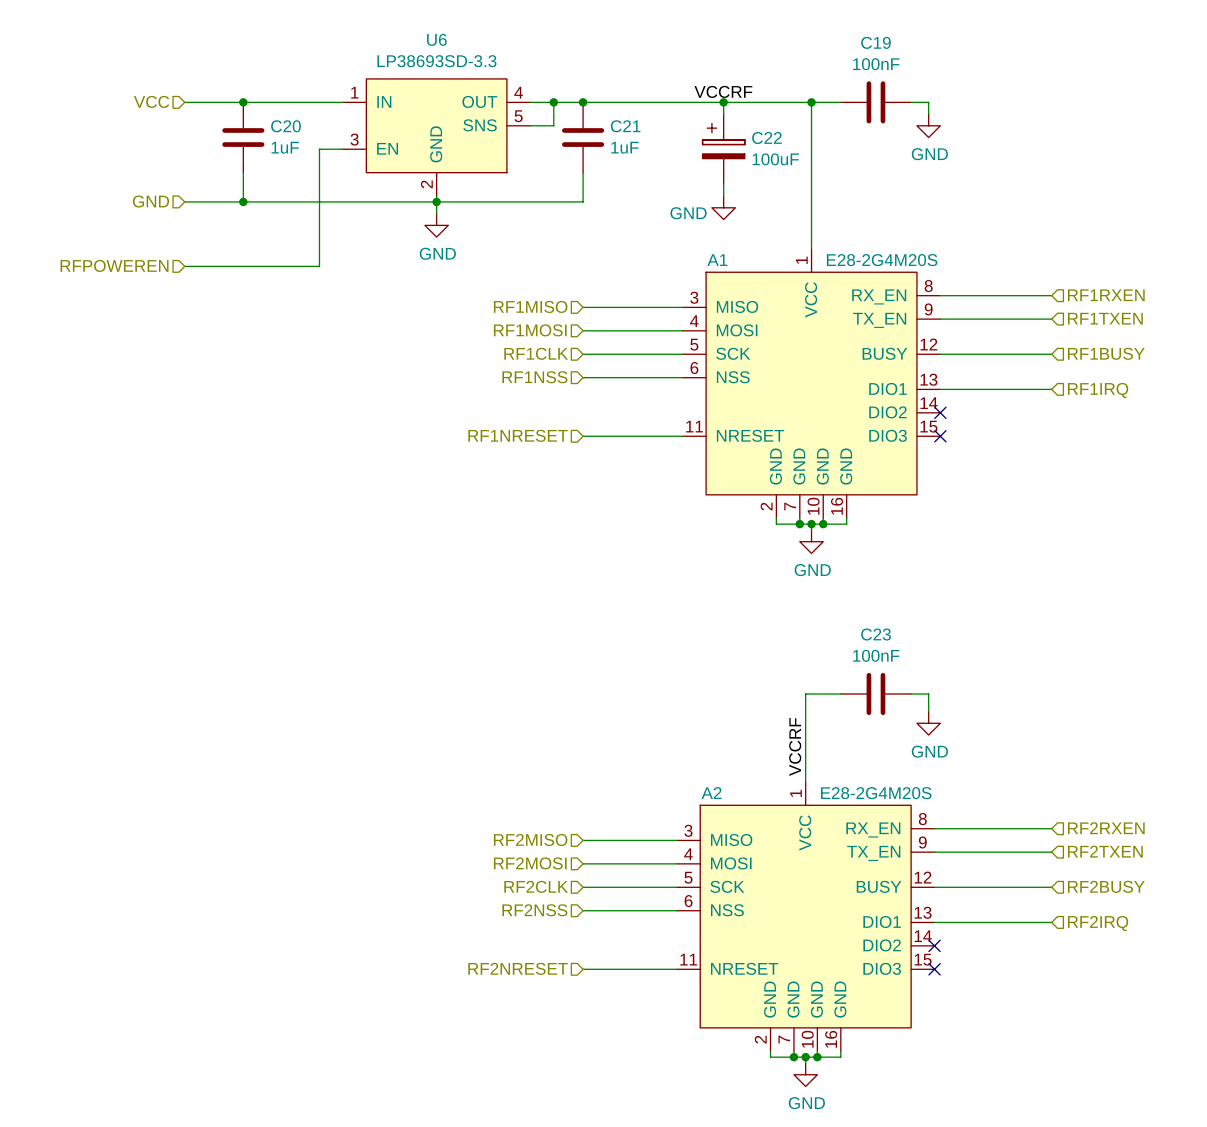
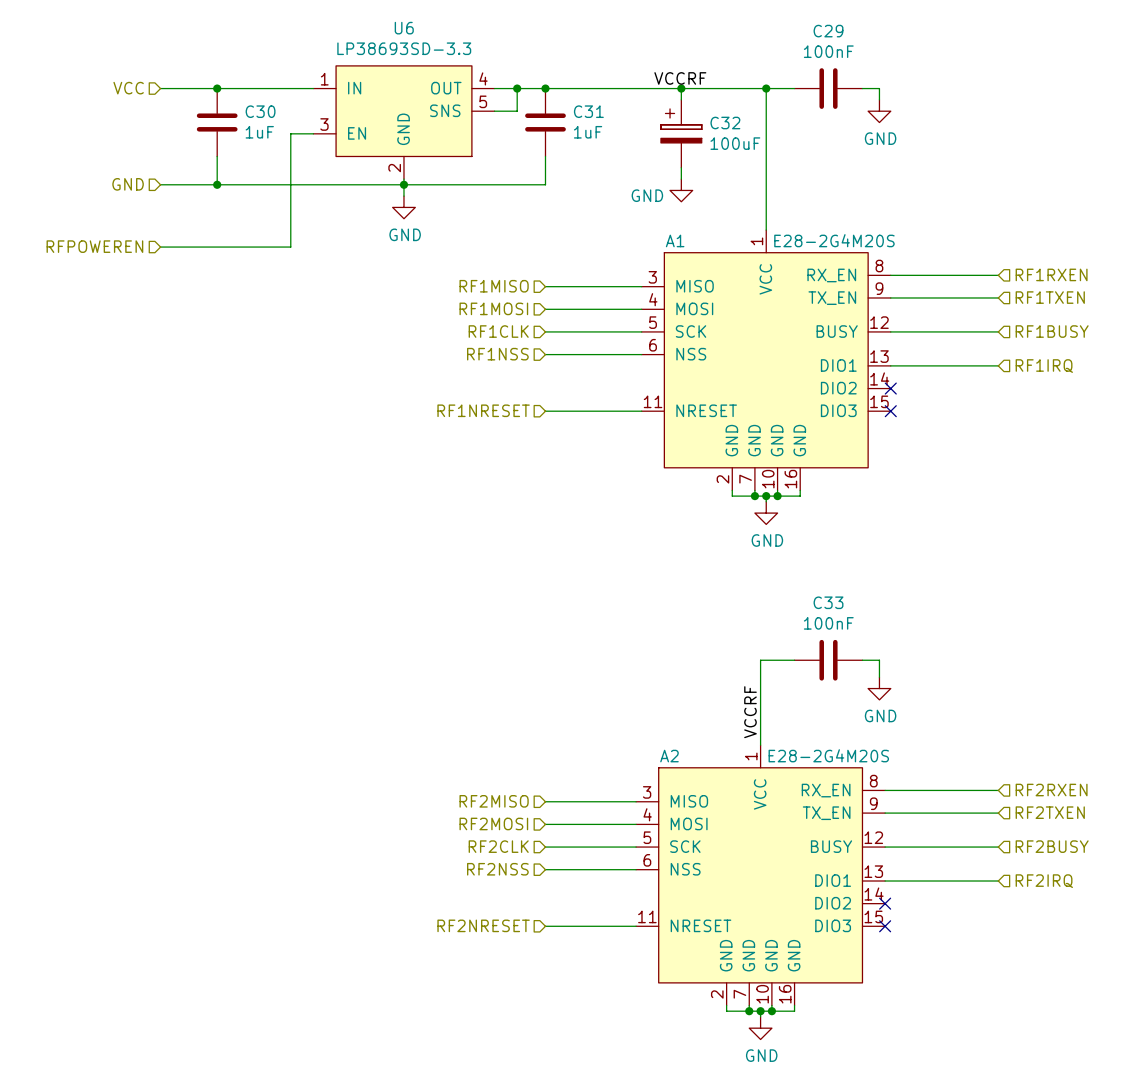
C19 name: C19 (875, 42) -> C29 (828, 31)
C20 name: C20 (285, 126) -> C30 (260, 111)
C21 name: C21 (625, 126) -> C31 (588, 111)
C22 name: C22 (766, 138) -> C32 (725, 123)
C23 name: C23 (876, 634) -> C33 (828, 602)

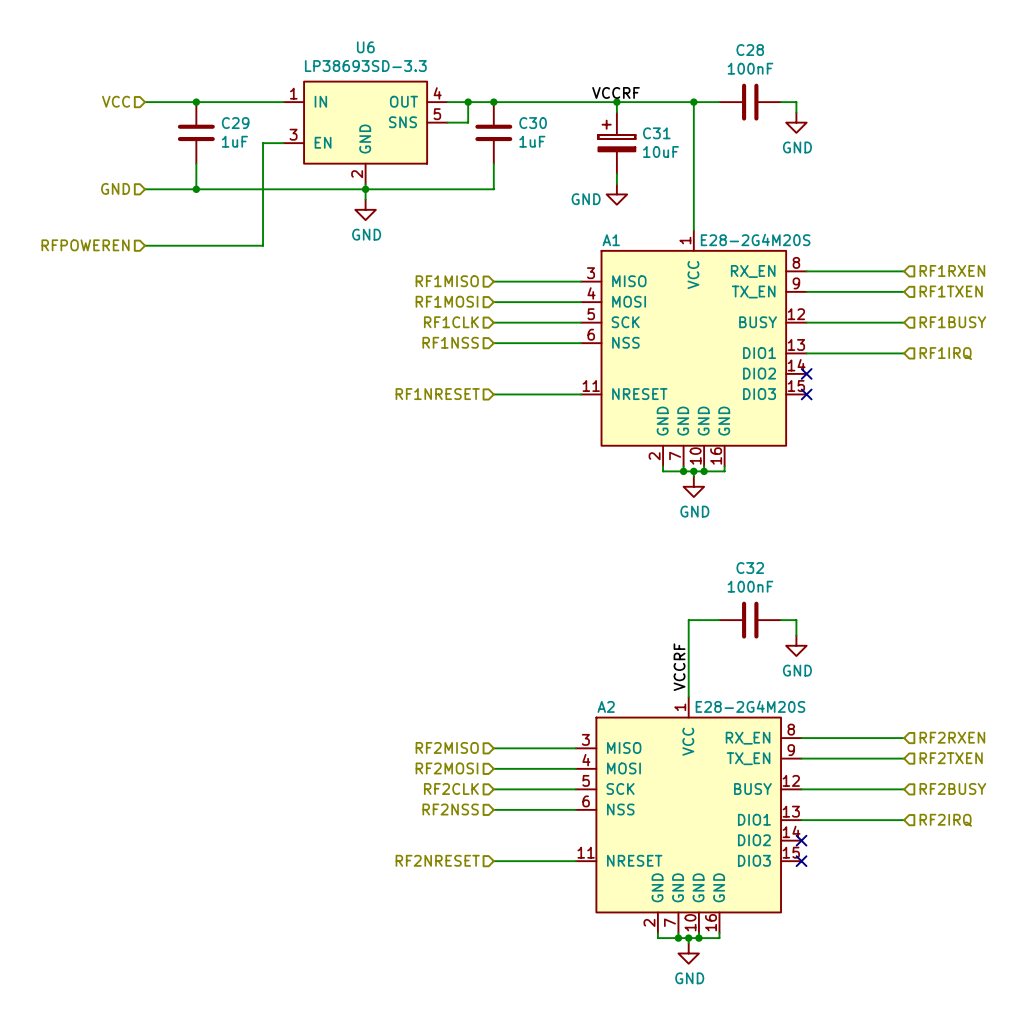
C29 name: C29 (828, 31) -> C28 (750, 50)
C30 name: C30 (260, 111) -> C29 (235, 123)
C31 name: C31 (588, 111) -> C30 (533, 123)
C32 name: C32 (725, 123) -> C31 (656, 133)
C32 value: 100uF (735, 143) -> 10uF (660, 152)
C33 name: C33 (828, 602) -> C32 (750, 568)

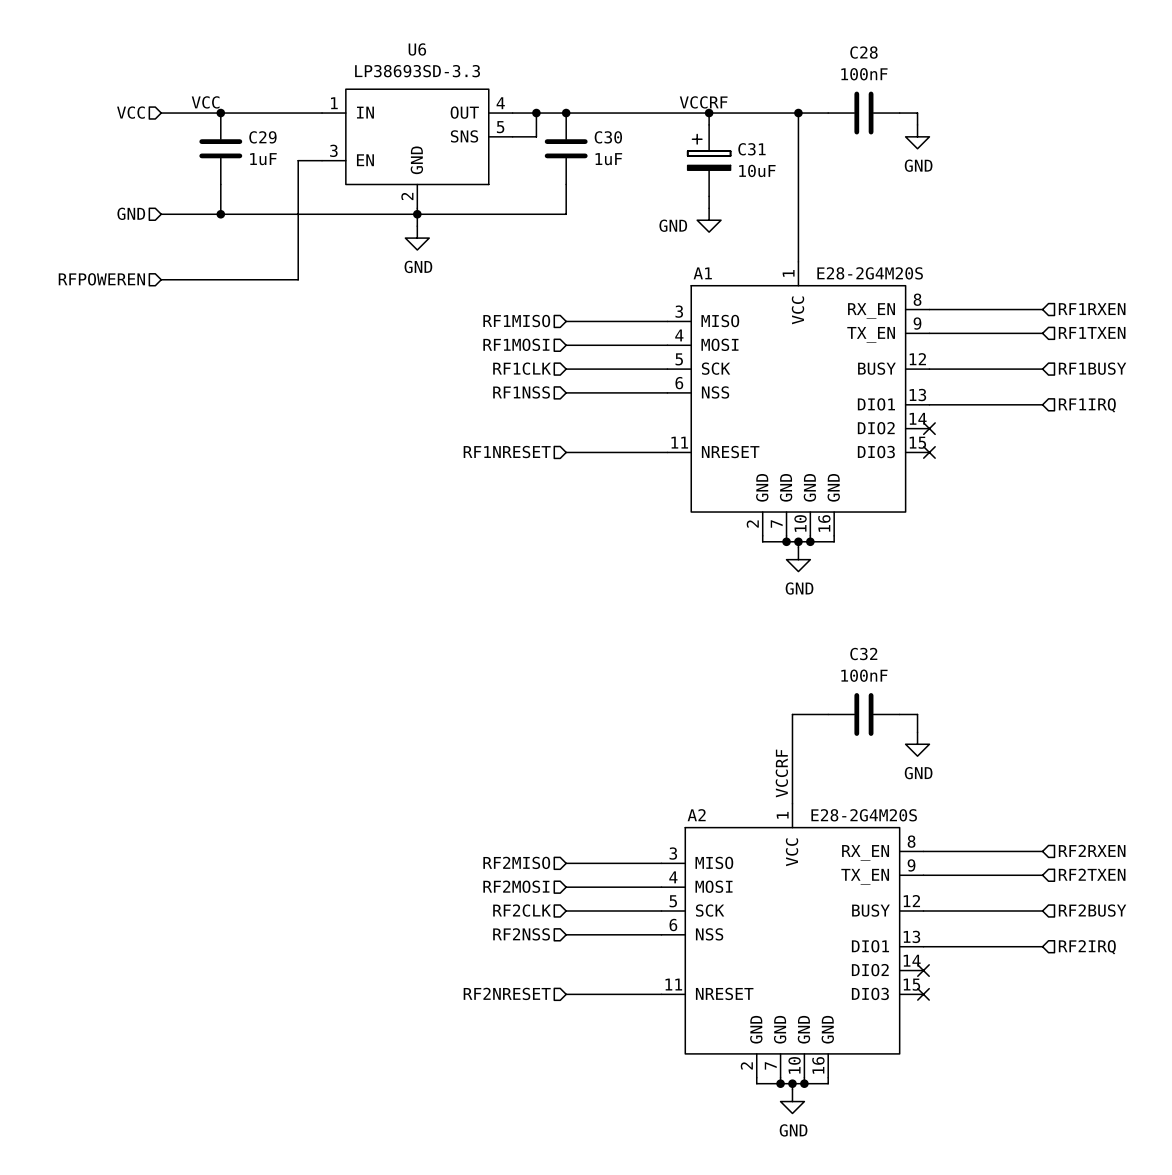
label: none -> VCC (205, 102)

